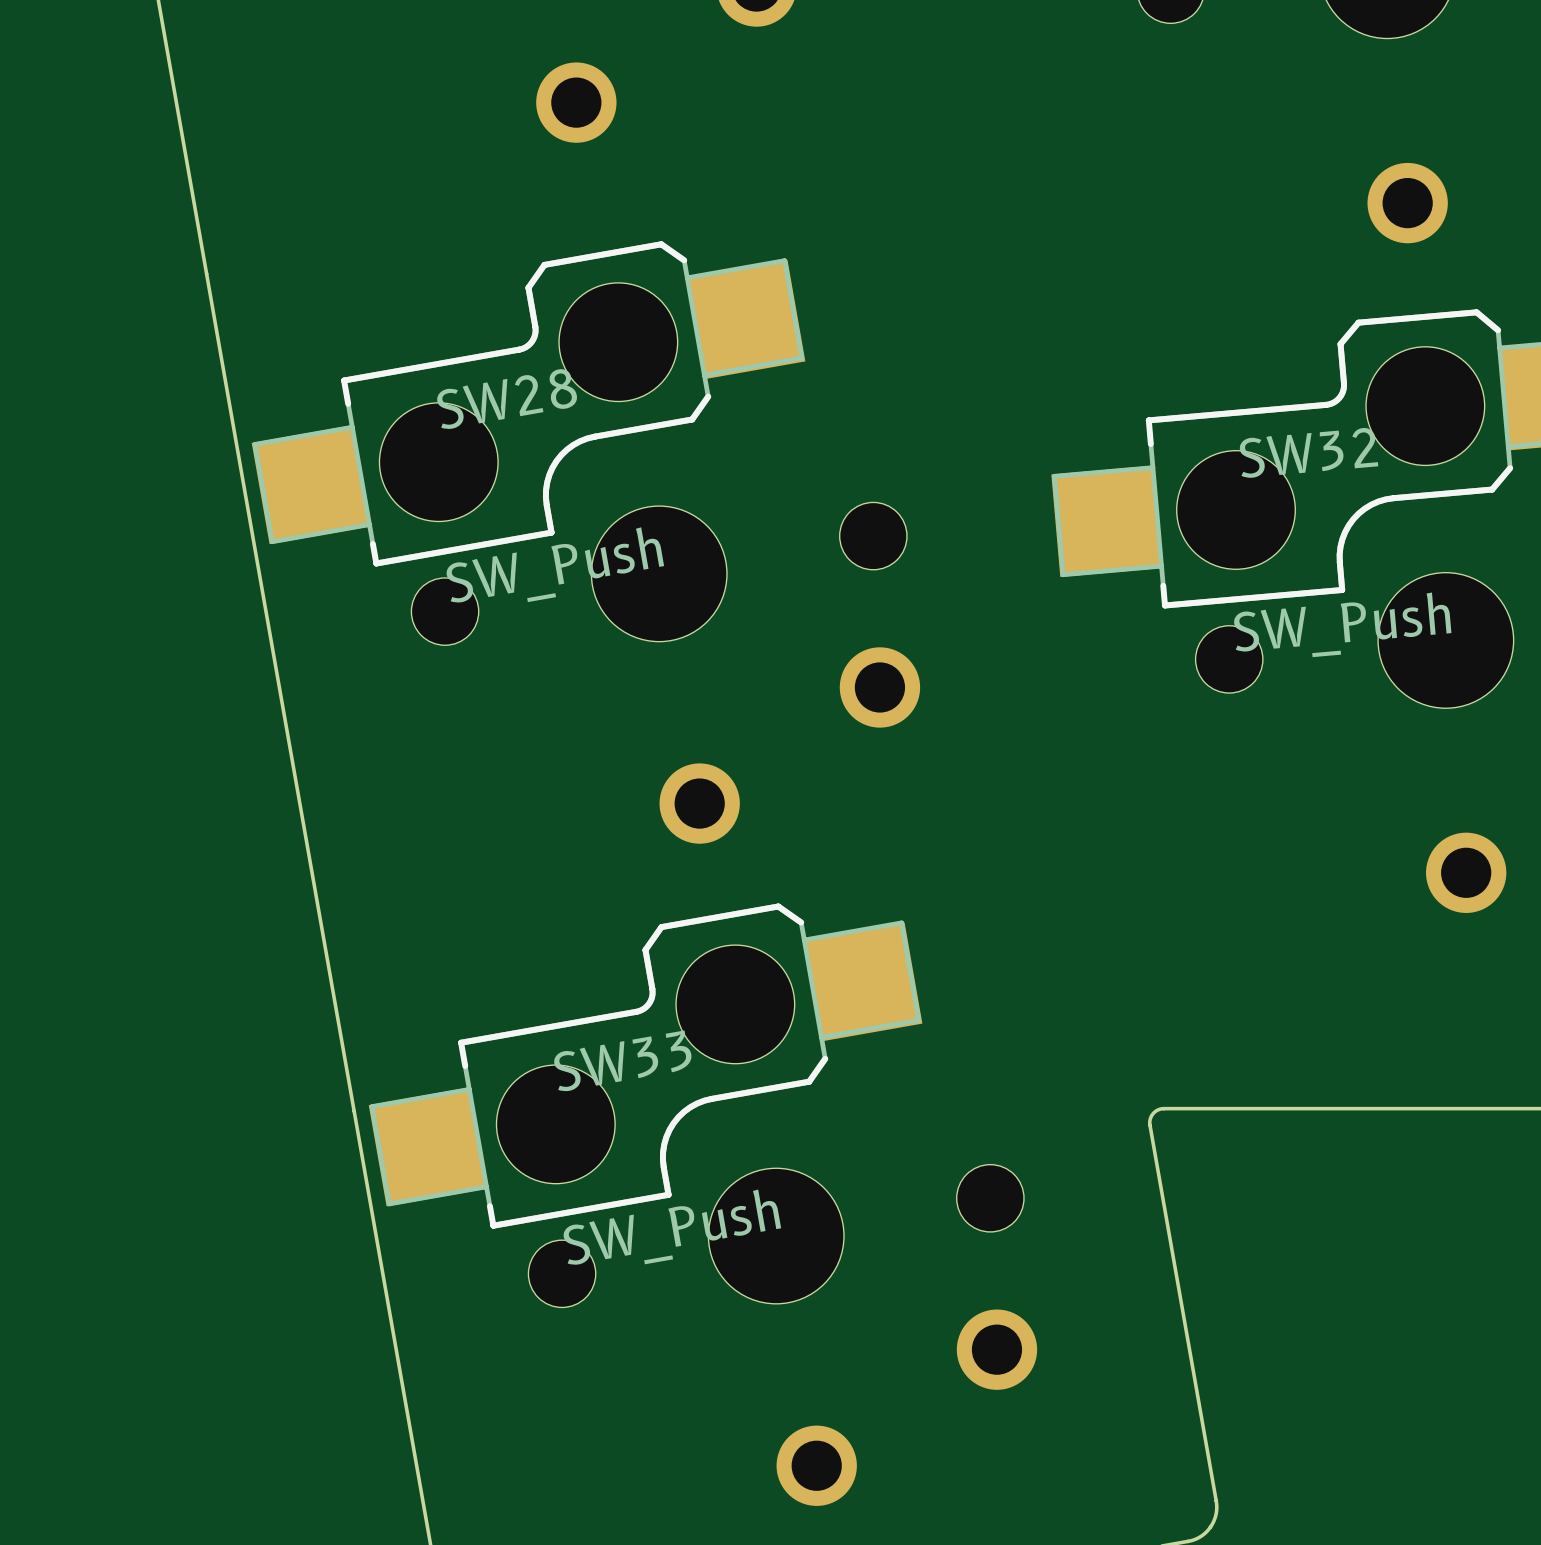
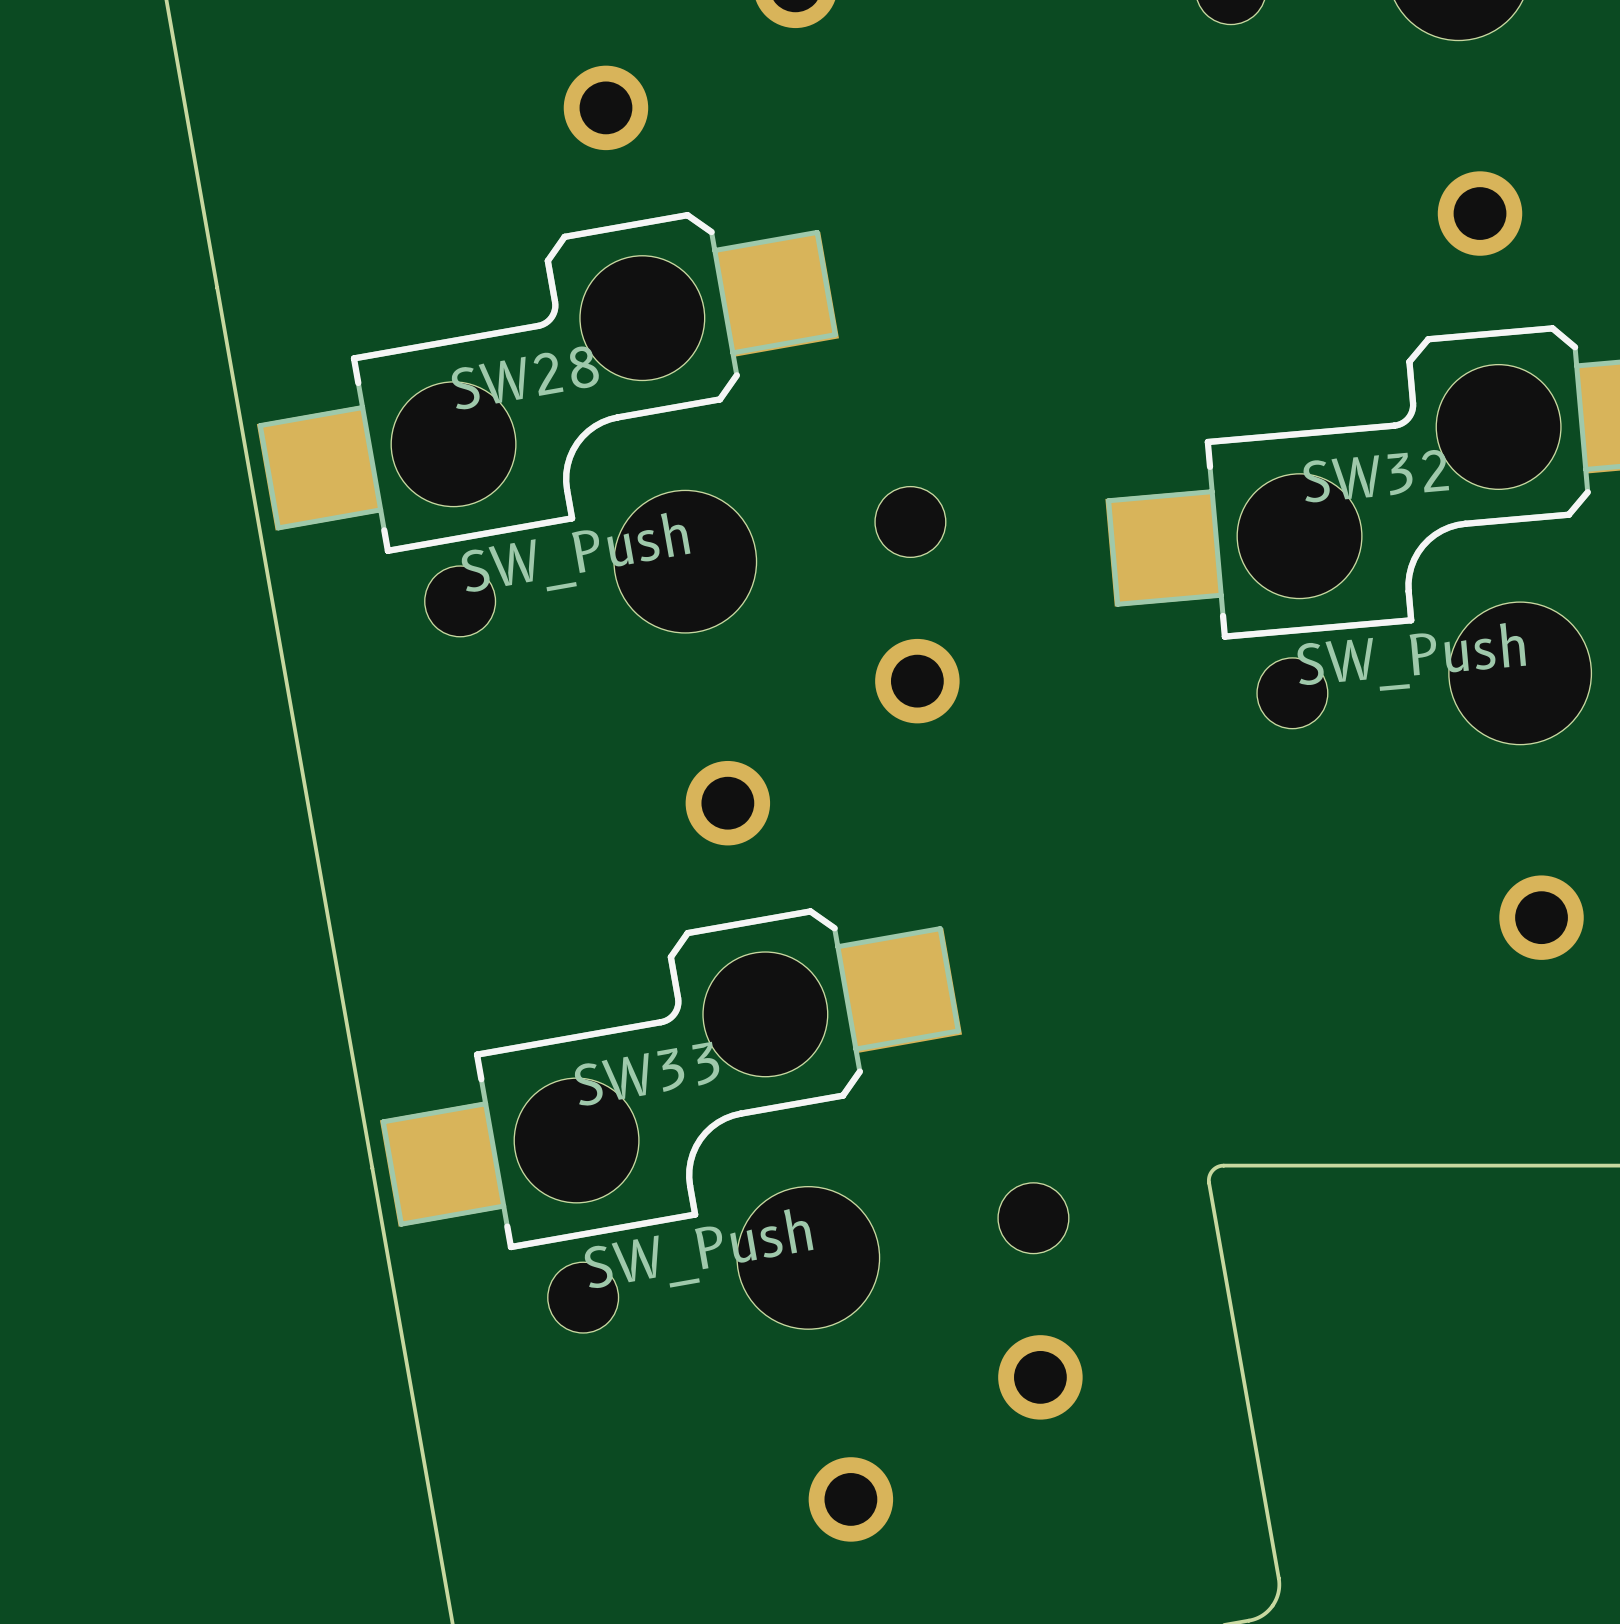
SW28 position: (585, 542) -> (608, 528)
SW33 position: (702, 1204) -> (731, 1224)

